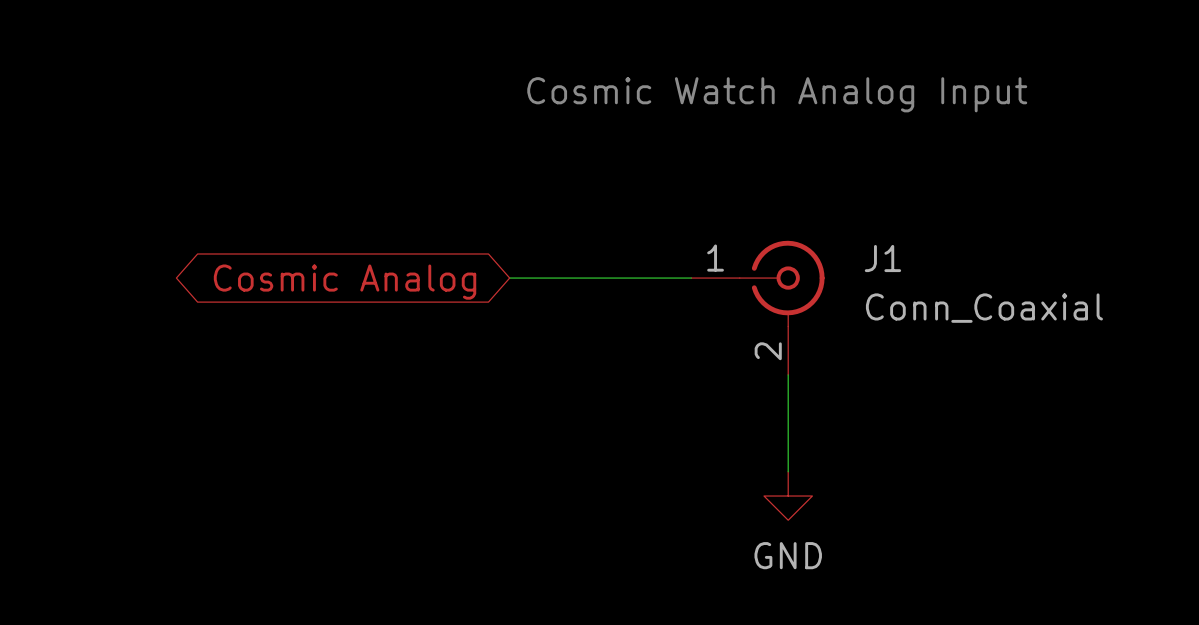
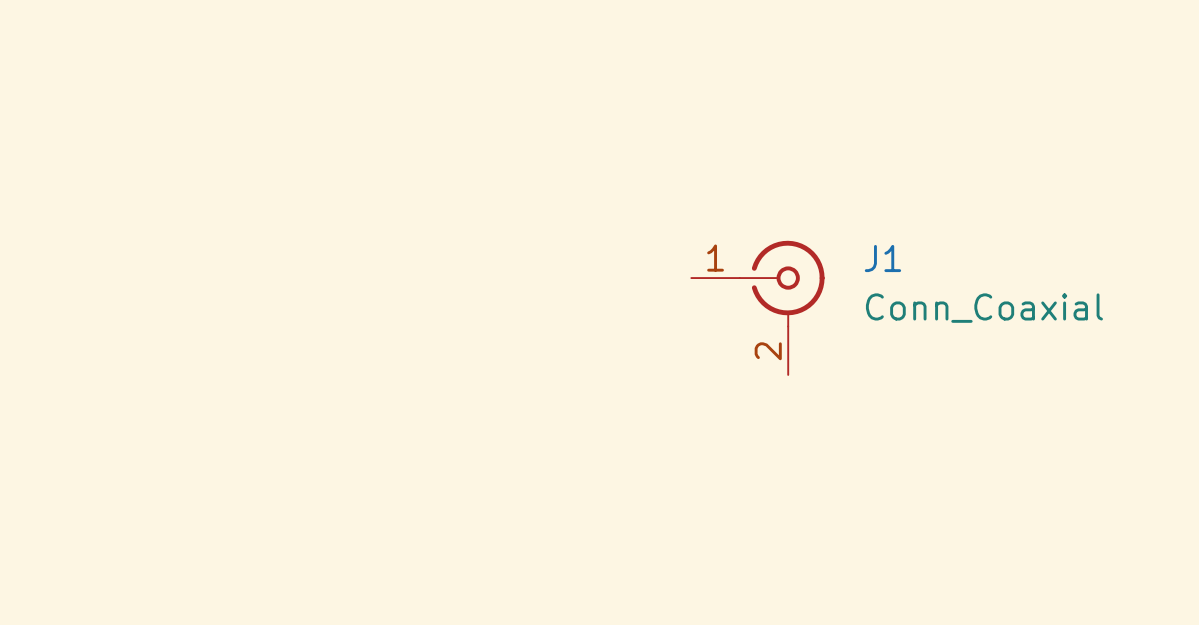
text: Cosmic Watch Analog Input (777, 94) -> none
wire: (509, 278) (691, 278) -> none
global label: Cosmic Analog (345, 282) -> none
wire: (788, 374) (788, 471) -> none
power symbol: GND (788, 496) -> none

